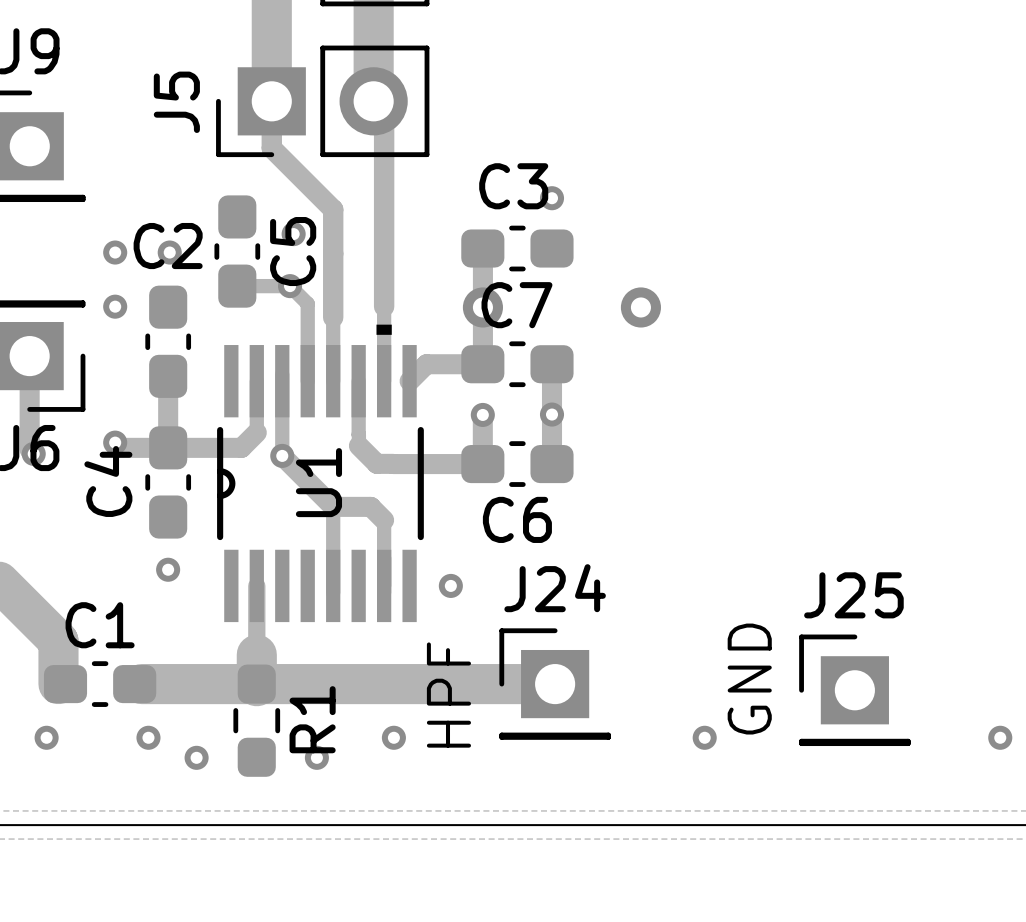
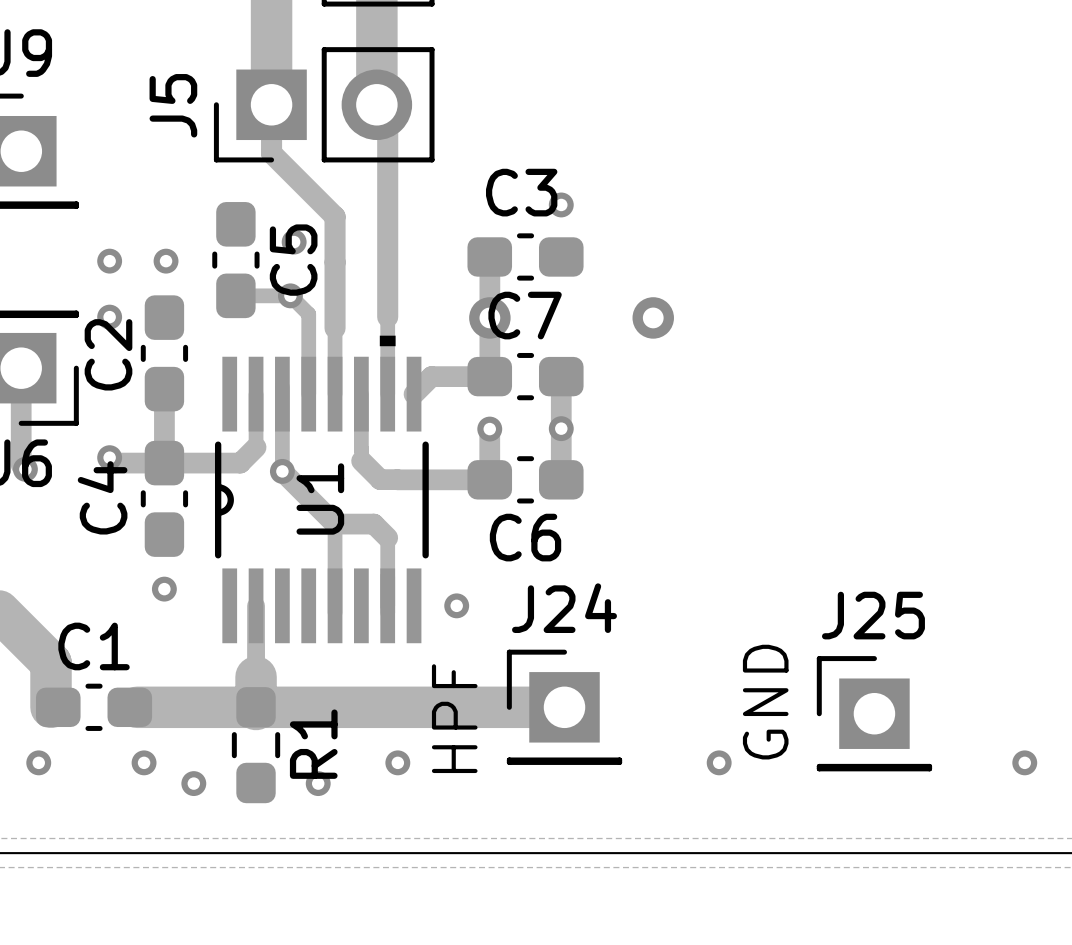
C2 name rotation: 0° (168, 246) -> 90° counterclockwise (108, 354)
C2 name position: C2 (168, 246) -> C2 (108, 354)

